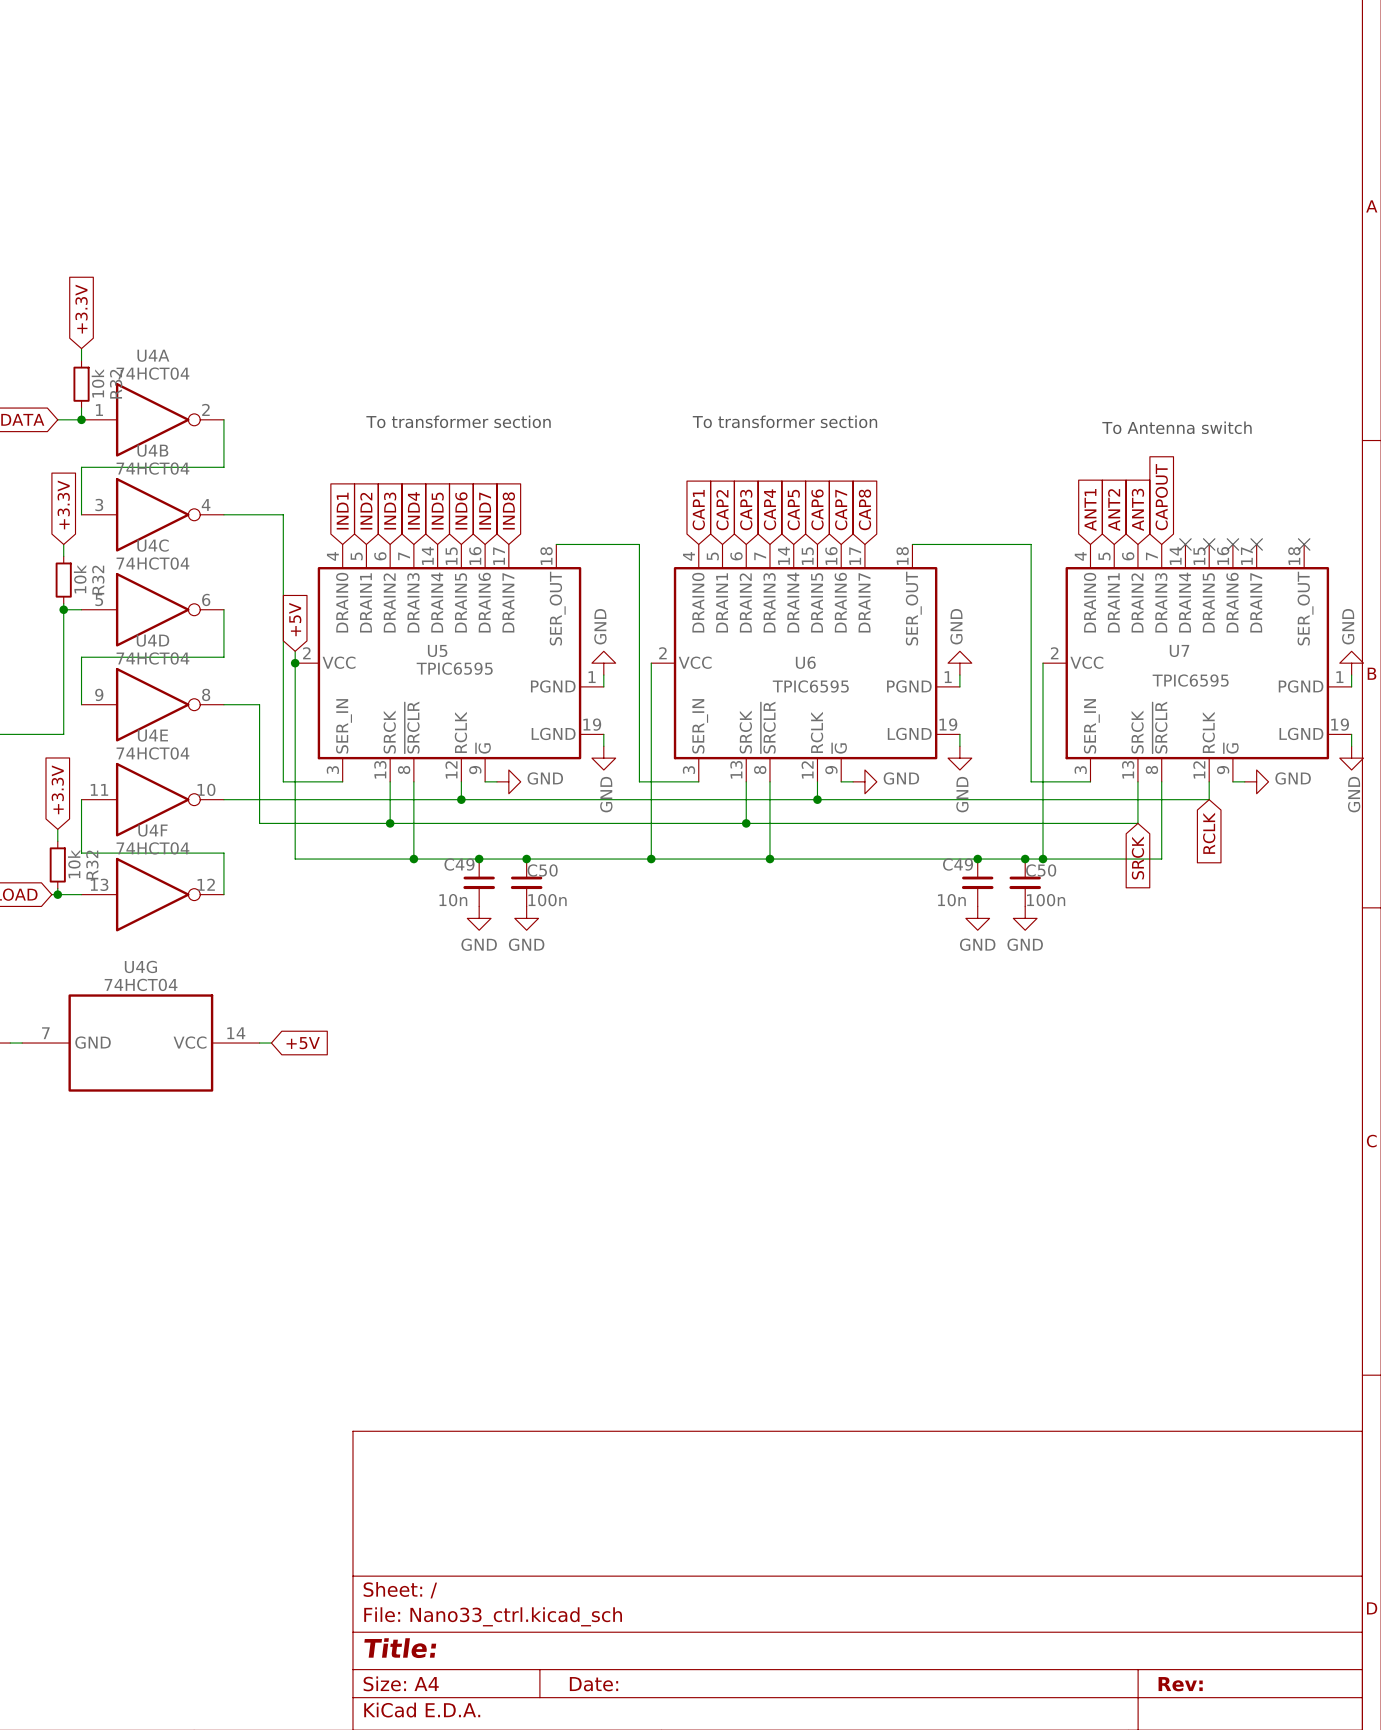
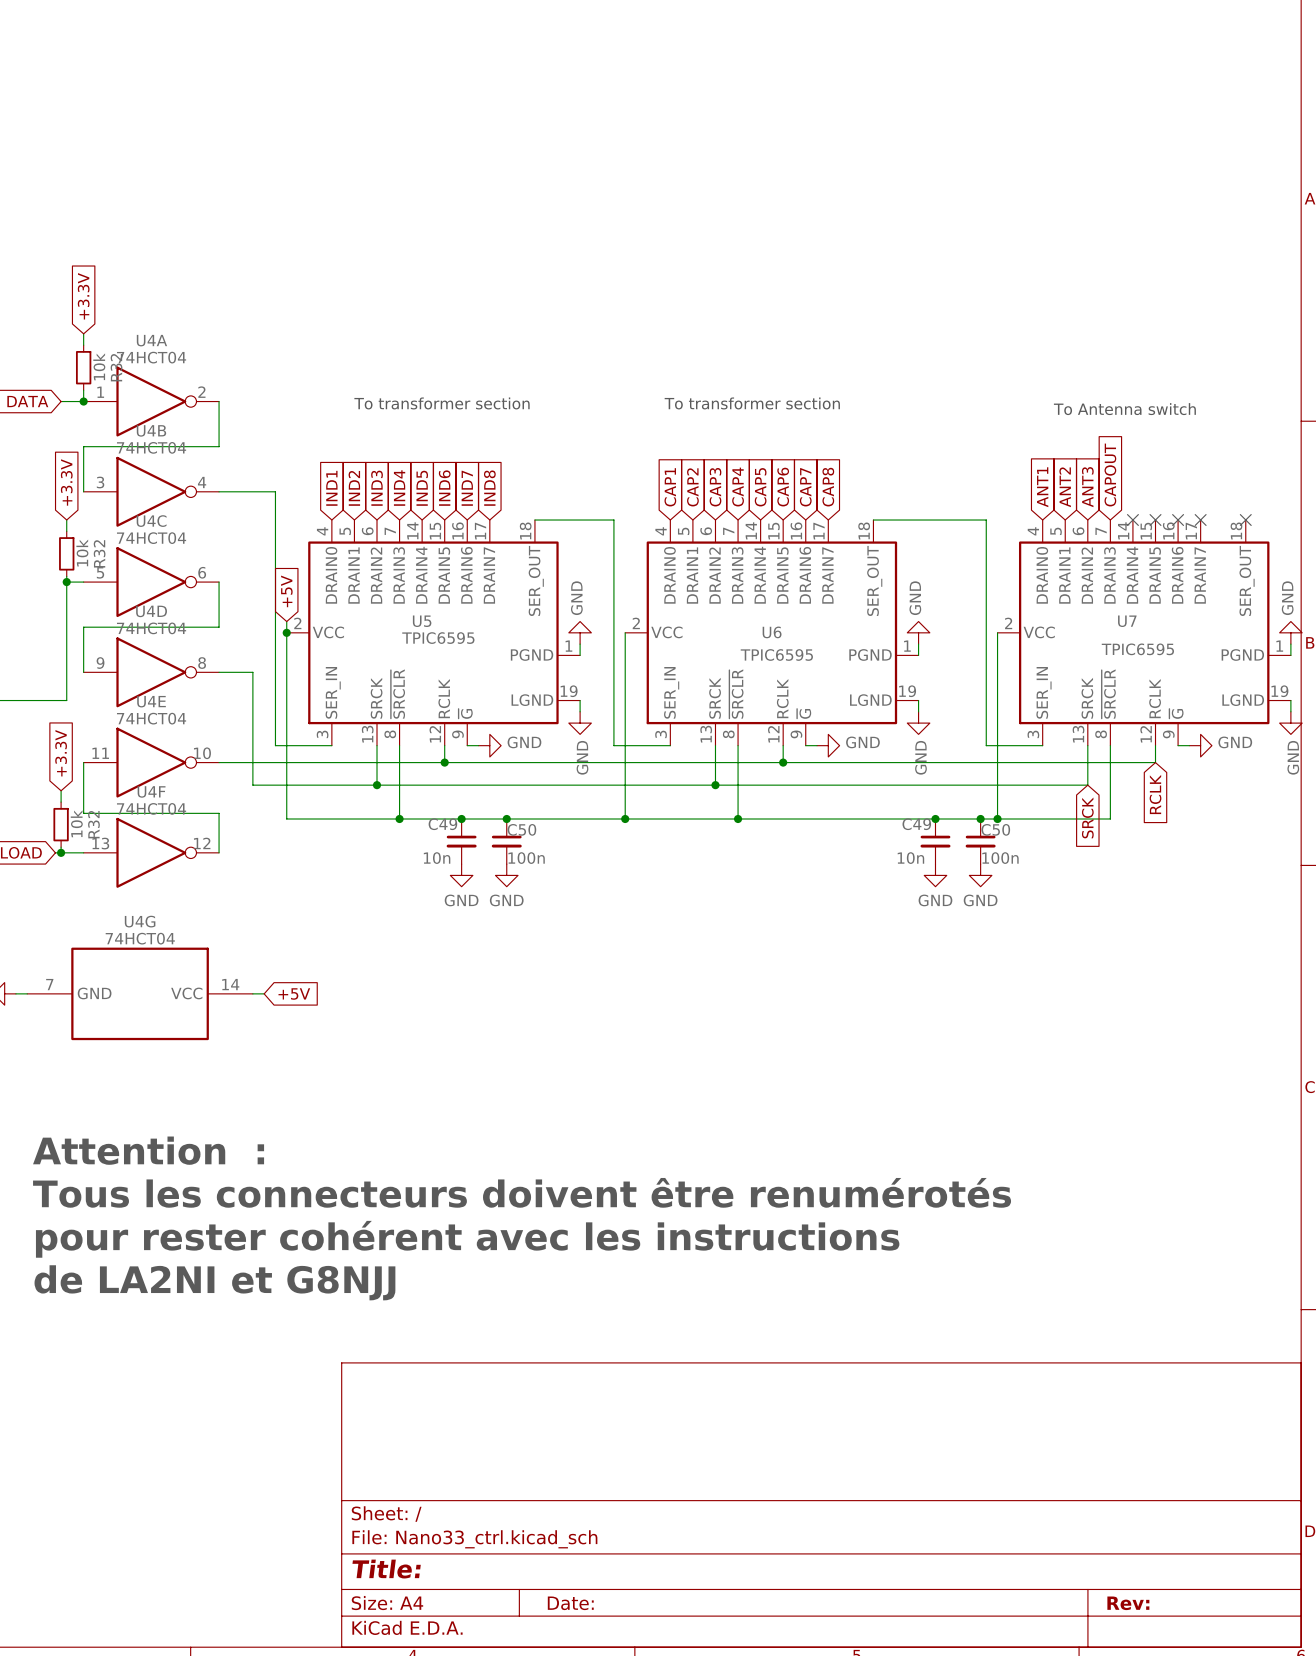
text: none -> Attention : (148, 1150)
text: none -> Tous les connecteurs doivent être renumérotés (522, 1192)
text: none -> pour rester cohérent avec les instructions (467, 1239)
text: none -> de LA2NI et G8NJJ (214, 1282)

